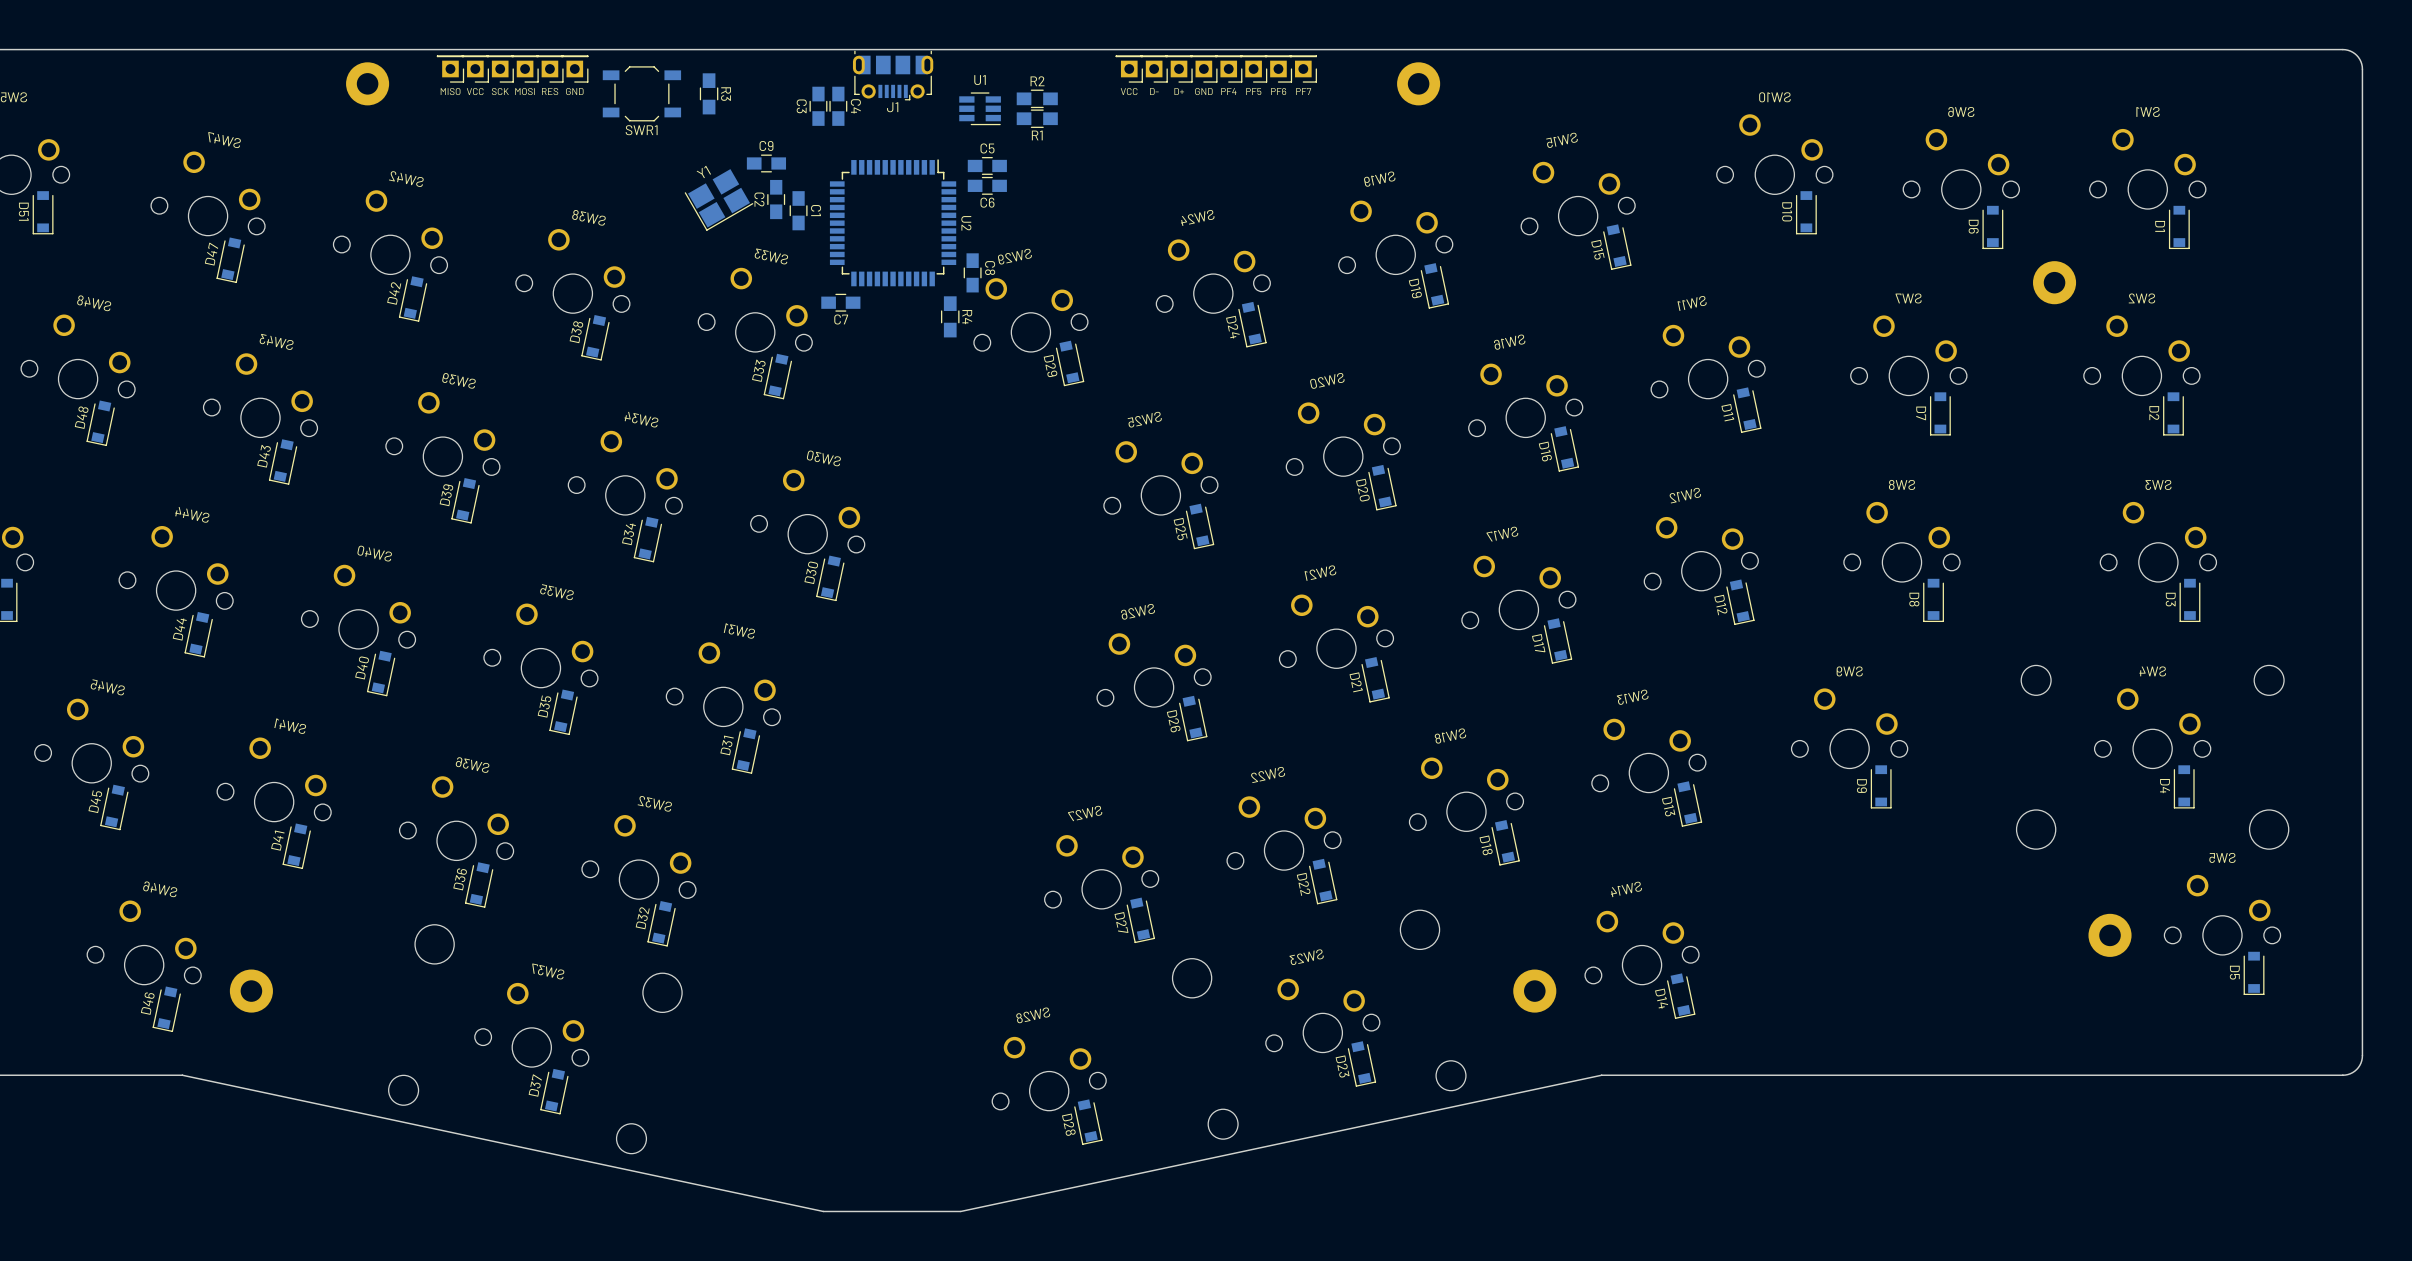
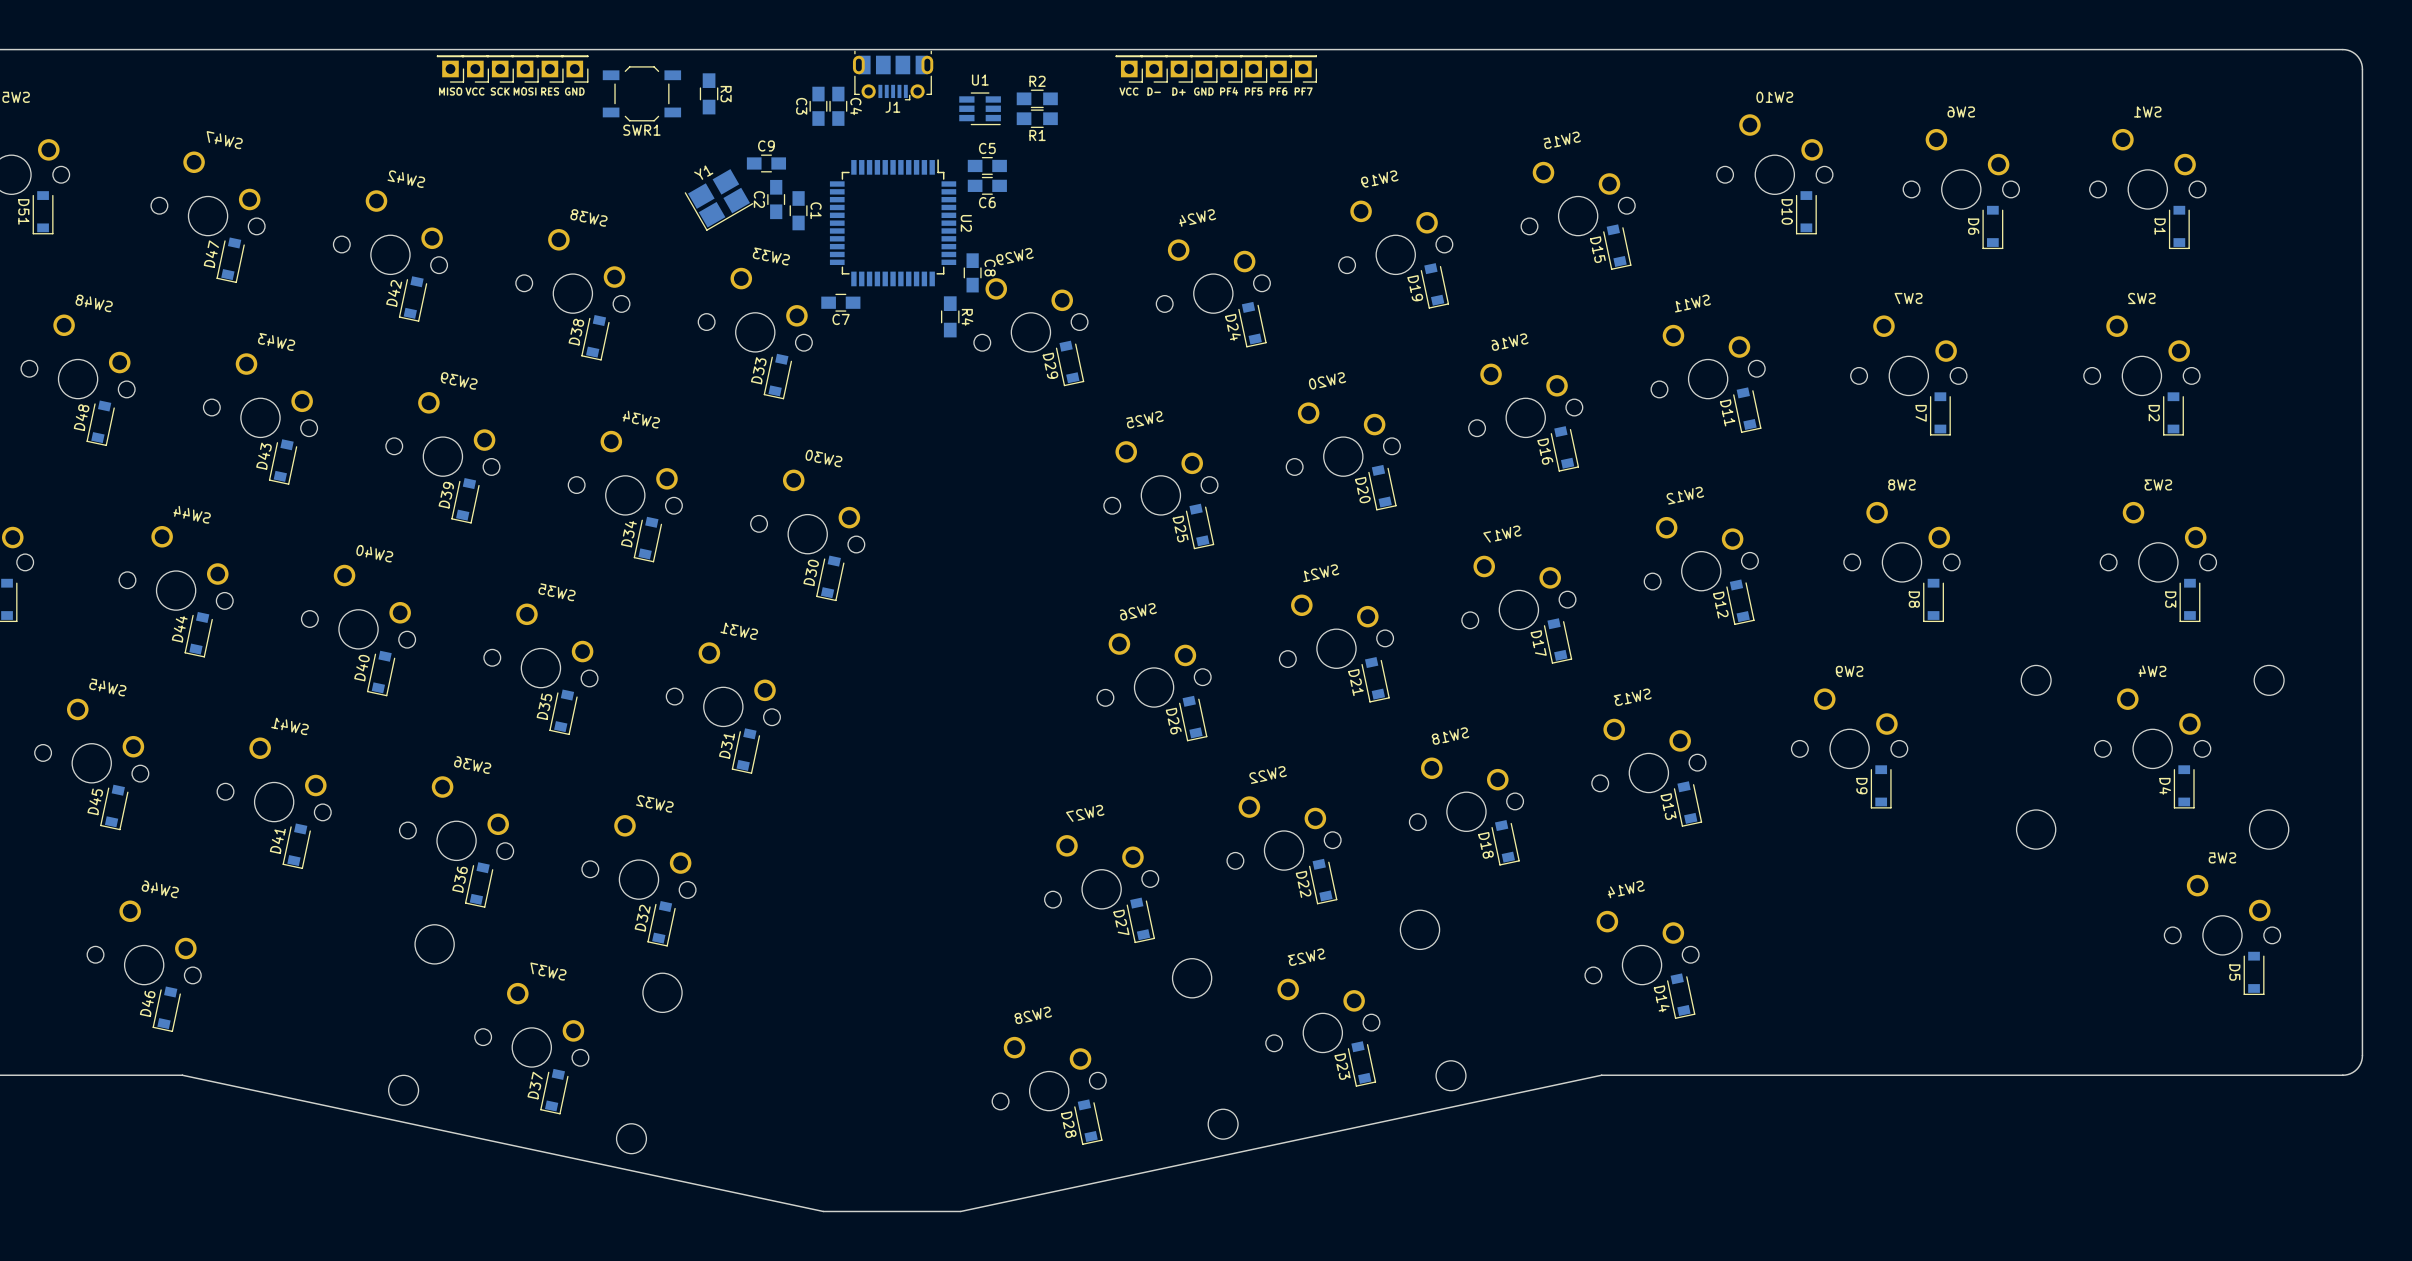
part: (367, 83) -> none
part: (1418, 83) -> none
part: (2054, 282) -> none
part: (2110, 935) -> none
part: (251, 991) -> none
part: (1534, 991) -> none

